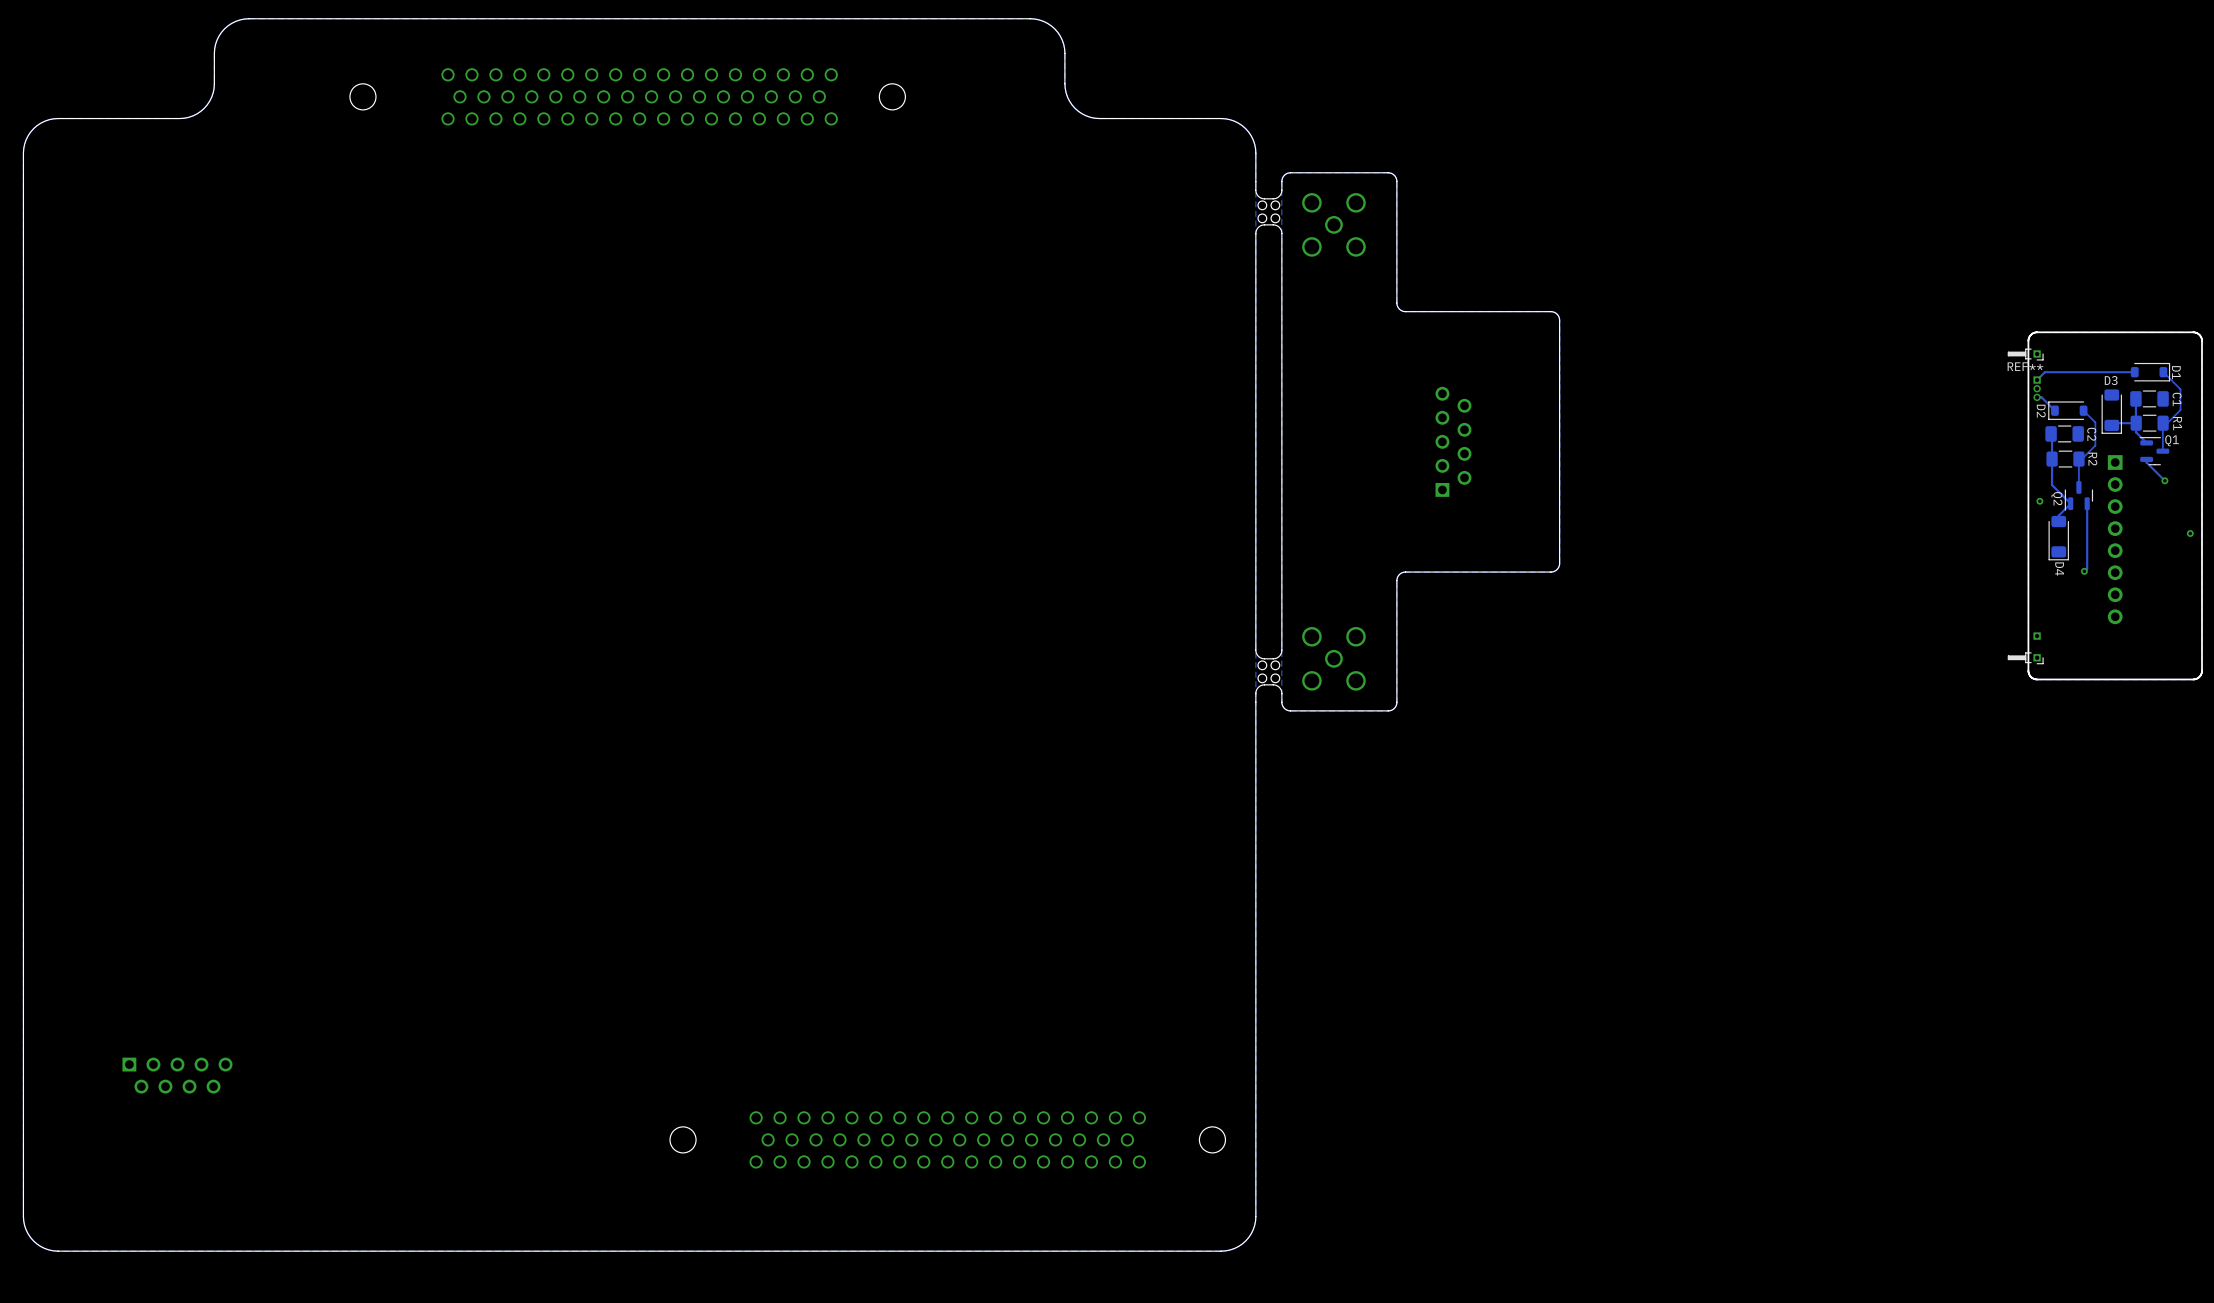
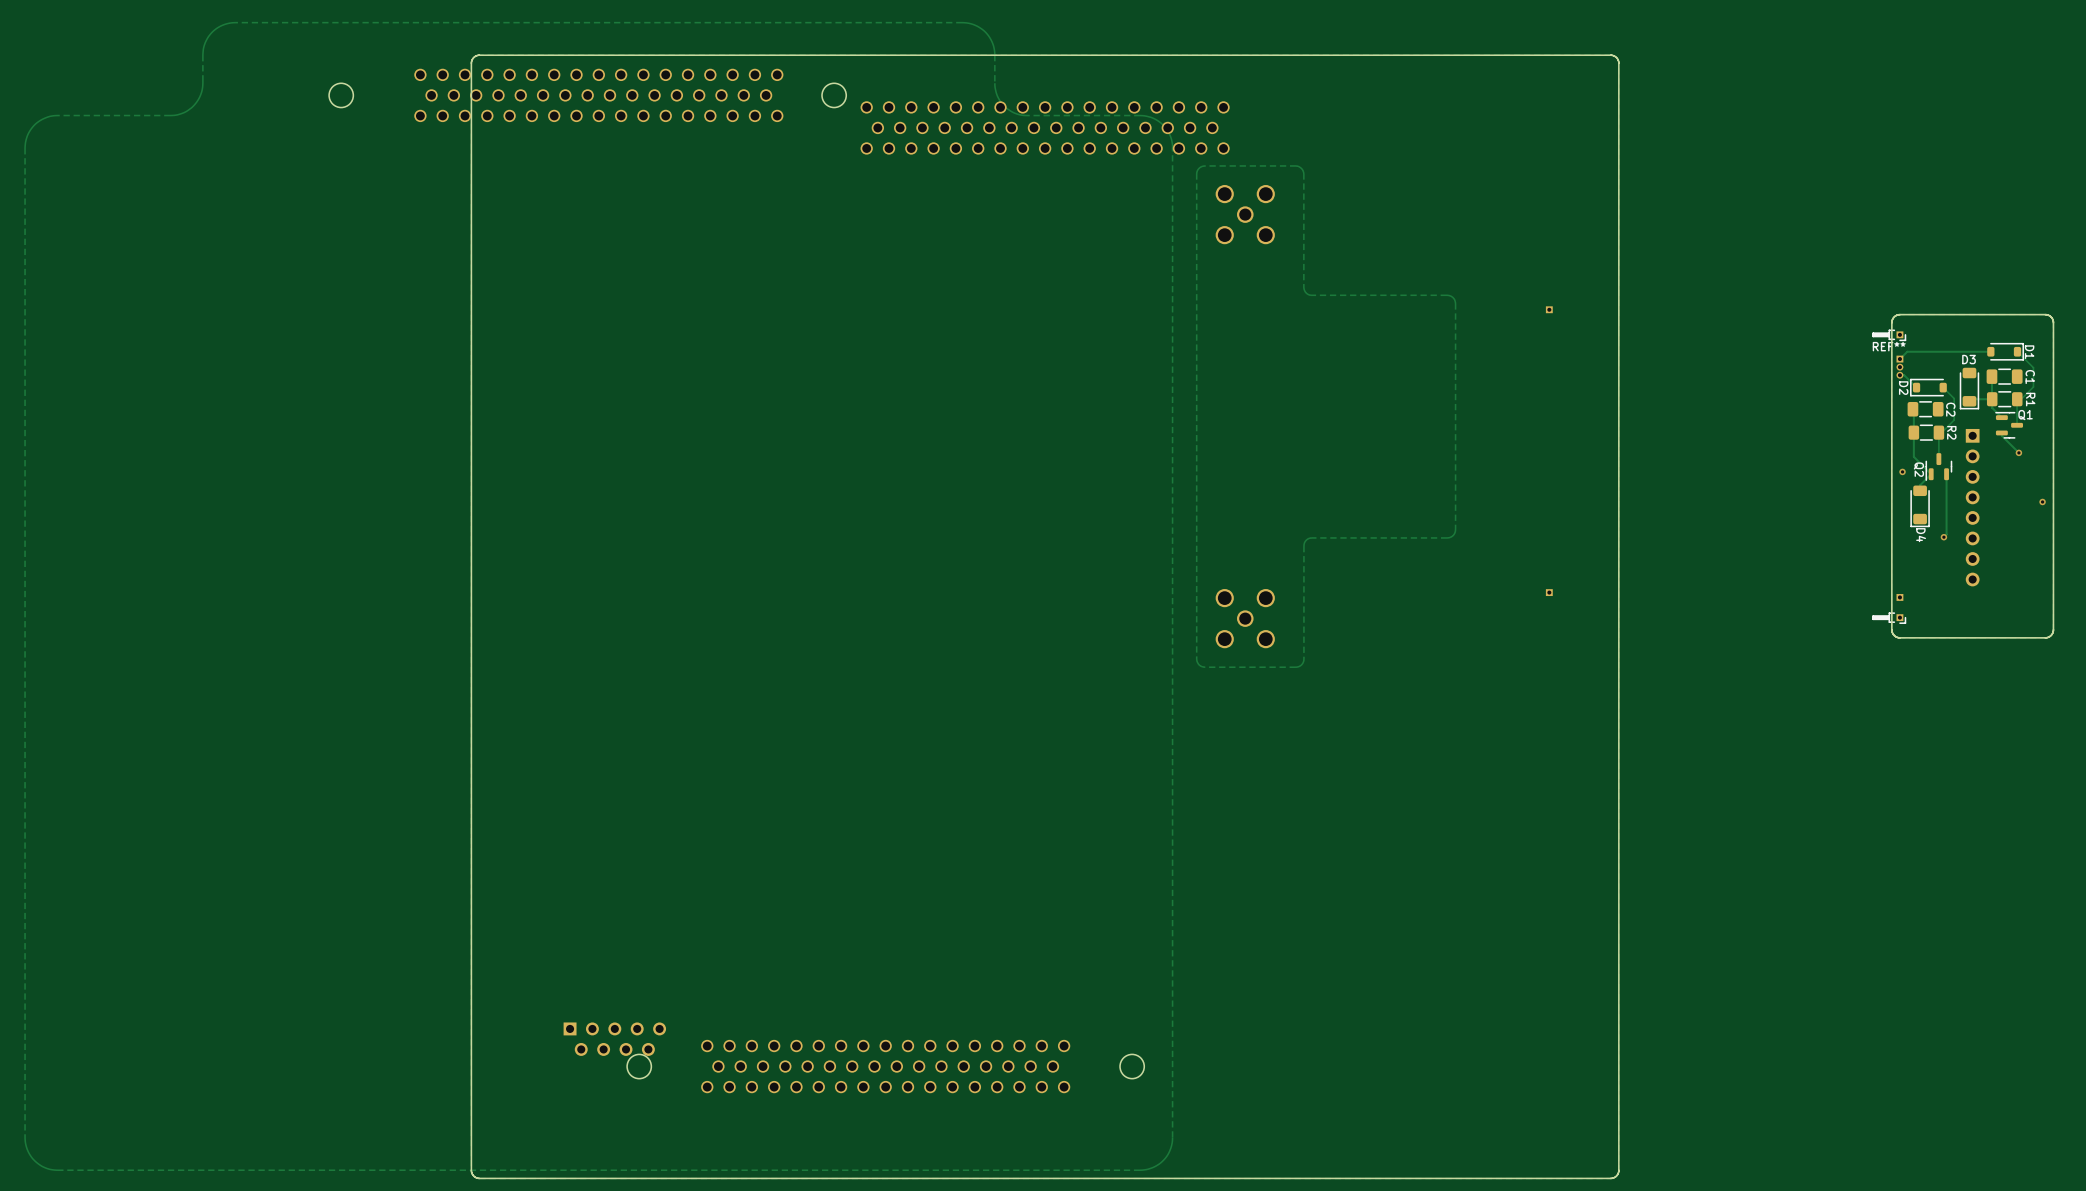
board edge: (1030, 18) (244, 19) (231, 23) (219, 36) (214, 48) (213, 92) (207, 104) (197, 113) (179, 118) (53, 118) (40, 123) (30, 132) (24, 144) (23, 153) (23, 1216) (28, 1233) (37, 1243) (49, 1249) (58, 1251) (1221, 1251) (1238, 1246) (1248, 1237) (1254, 1225) (1255, 1216) (1256, 690) (1262, 685) (1277, 686) (1281, 691) (1282, 705) (1289, 710) (1391, 710) (1396, 703) (1396, 580) (1400, 573) (1405, 572) (1550, 572) (1557, 568) (1559, 563) (1559, 318) (1556, 313) (1550, 311) (1400, 310) (1396, 302) (1396, 181) (1393, 174) (1388, 172) (1288, 173) (1282, 178) (1281, 192) (1279, 196) (1274, 198) (1260, 197) (1255, 191) (1254, 144) (1251, 135) (1242, 125) (1225, 118) (1099, 118) (1082, 113) (1072, 104) (1066, 92) (1064, 48) (1060, 36) (1047, 23) (1030, 18) -> (1610, 55) (1616, 57) (1618, 63) (1618, 1170) (1616, 1176) (1610, 1178) (479, 1178) (473, 1176) (471, 1170) (471, 63) (473, 57) (479, 55) (1610, 55)
part: none -> (1045, 127)
round board edge: [1257, 200, 1268, 211] -> none
round board edge: [1270, 200, 1281, 211] -> none
round board edge: [1257, 213, 1268, 224] -> none
round board edge: [1270, 213, 1281, 224] -> none
board edge: (1273, 224) (1260, 225) (1255, 233) (1255, 650) (1258, 656) (1264, 658) (1276, 657) (1281, 650) (1281, 233) (1279, 227) (1273, 224) -> none
part: none -> (1549, 309)
part: (1453, 441) -> none
part: none -> (1549, 592)
round board edge: [1257, 660, 1268, 671] -> none
round board edge: [1270, 660, 1281, 671] -> none
round board edge: [1257, 673, 1268, 684] -> none
round board edge: [1270, 673, 1281, 684] -> none
part: (177, 1075) -> none
part: none -> (614, 1039)

